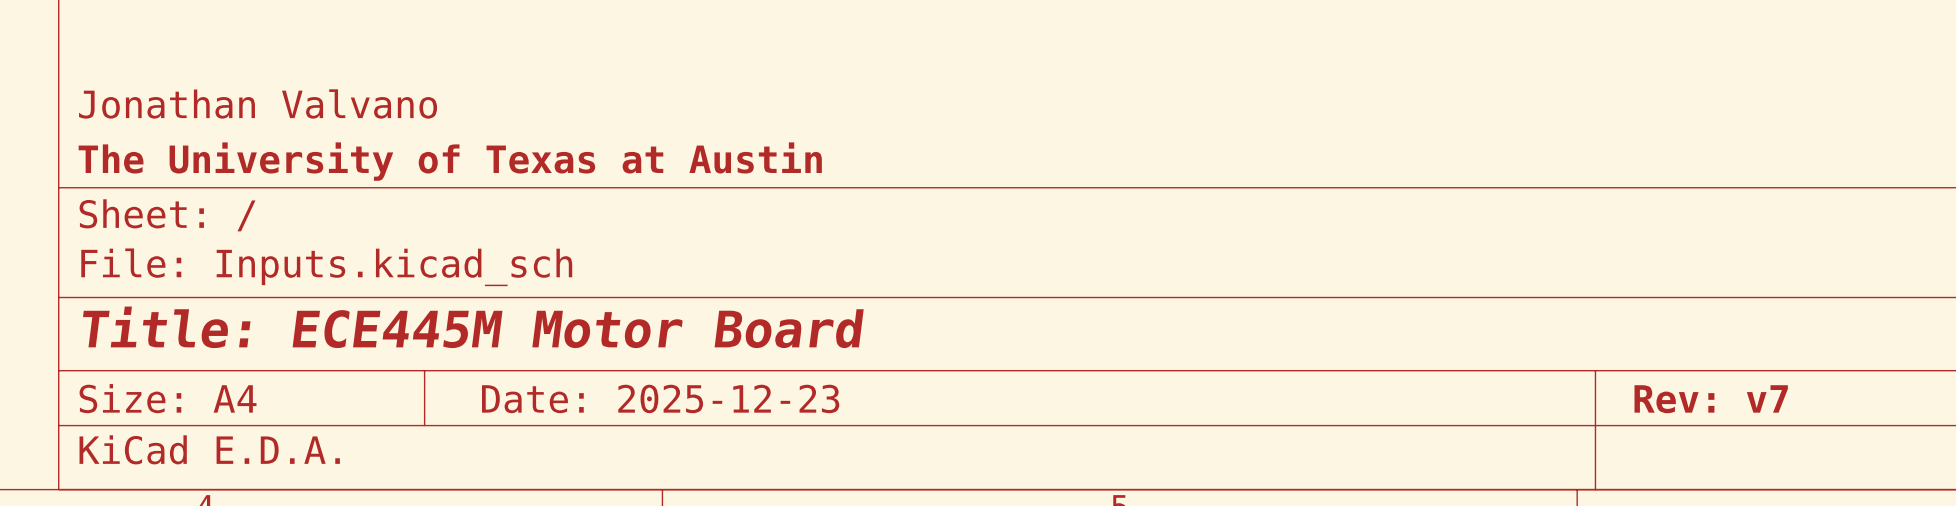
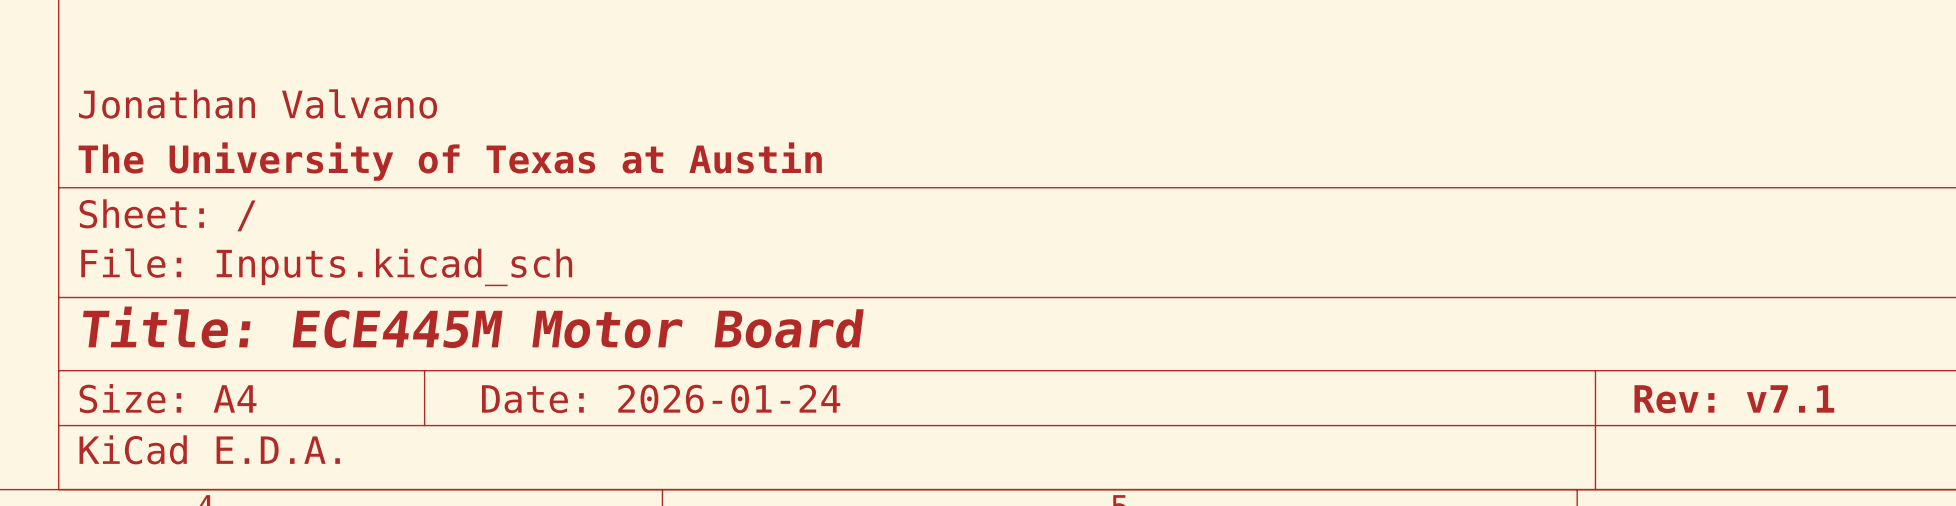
title block: Date: 2025-12-23 (660, 398) -> Date: 2026-01-24 (661, 398)
title block: Rev: v7 (1711, 399) -> Rev: v7.1 (1734, 399)

